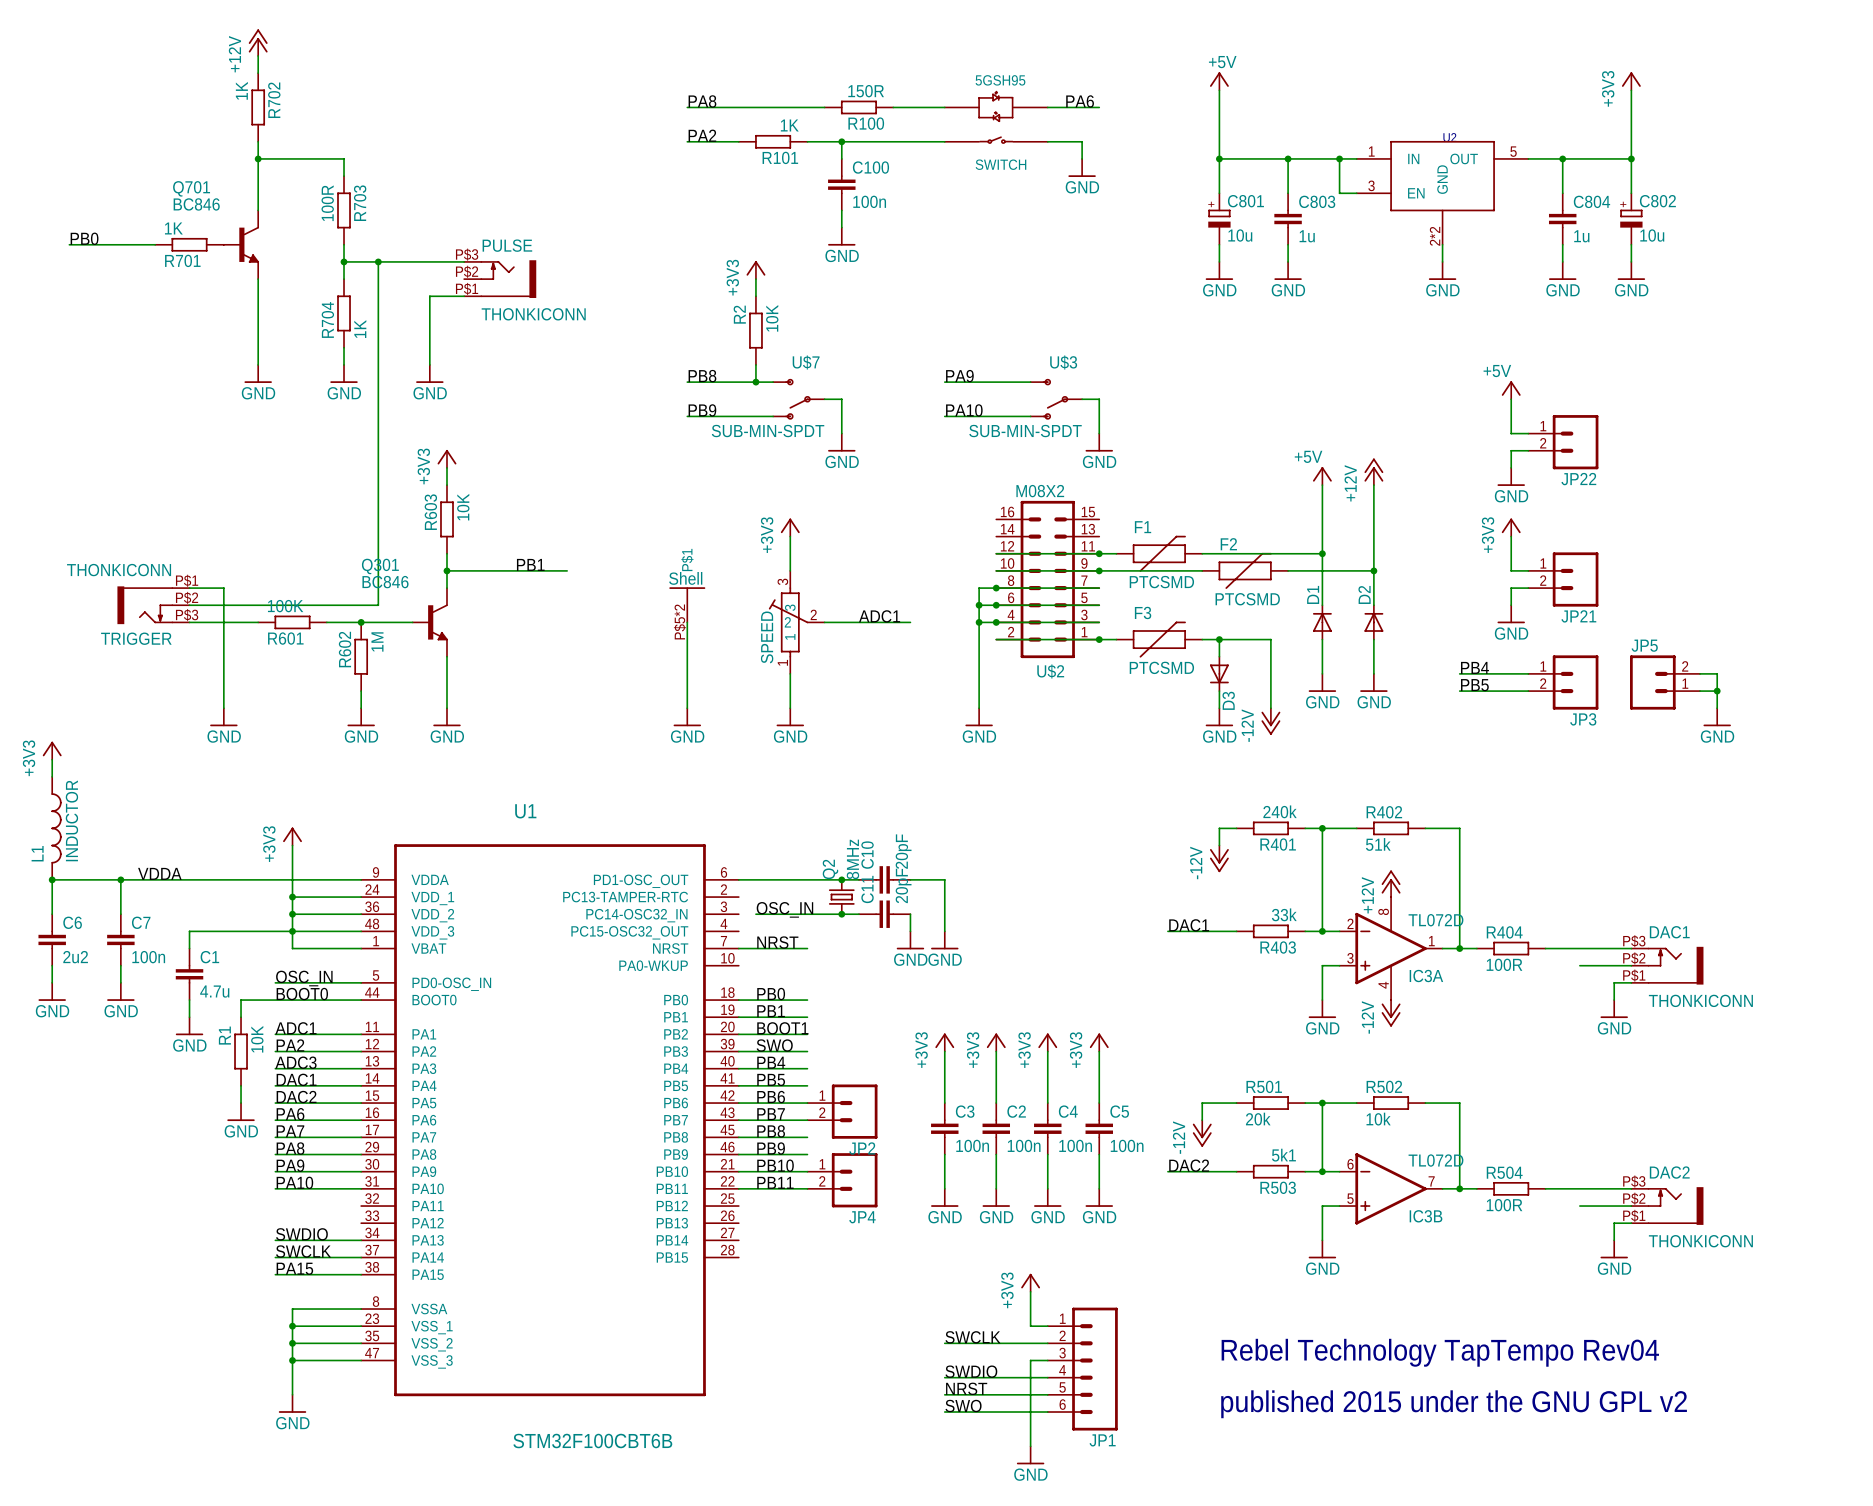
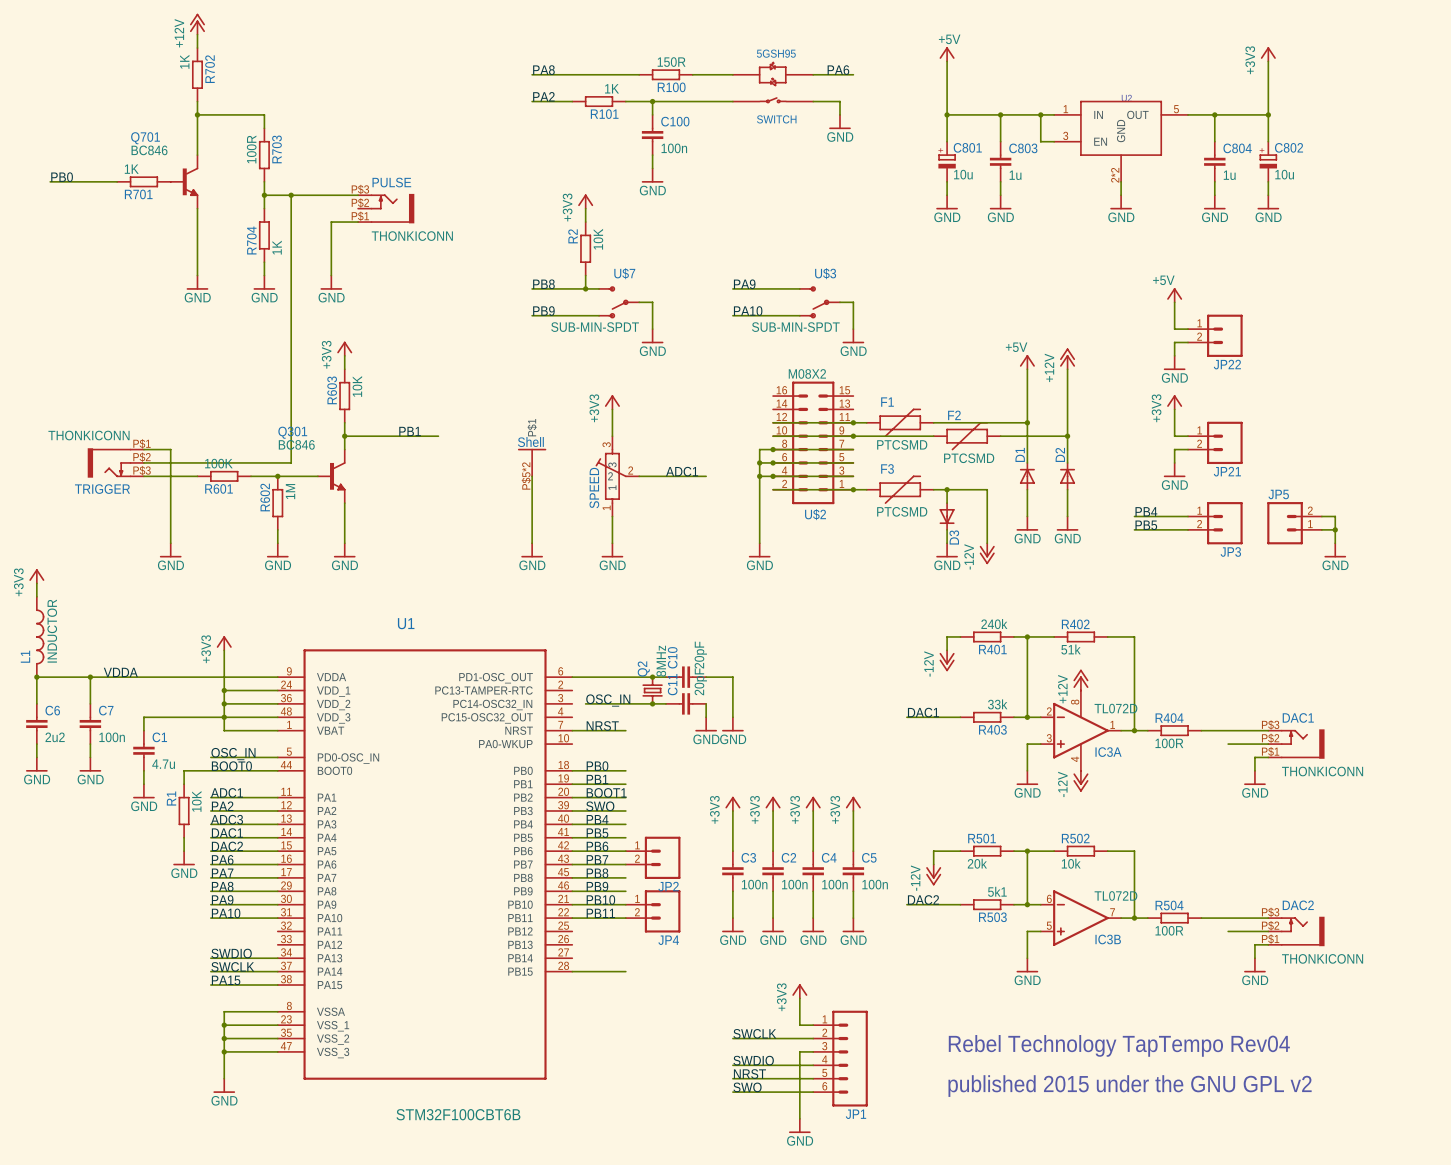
wire: none -> (572, 971) (625, 971)

